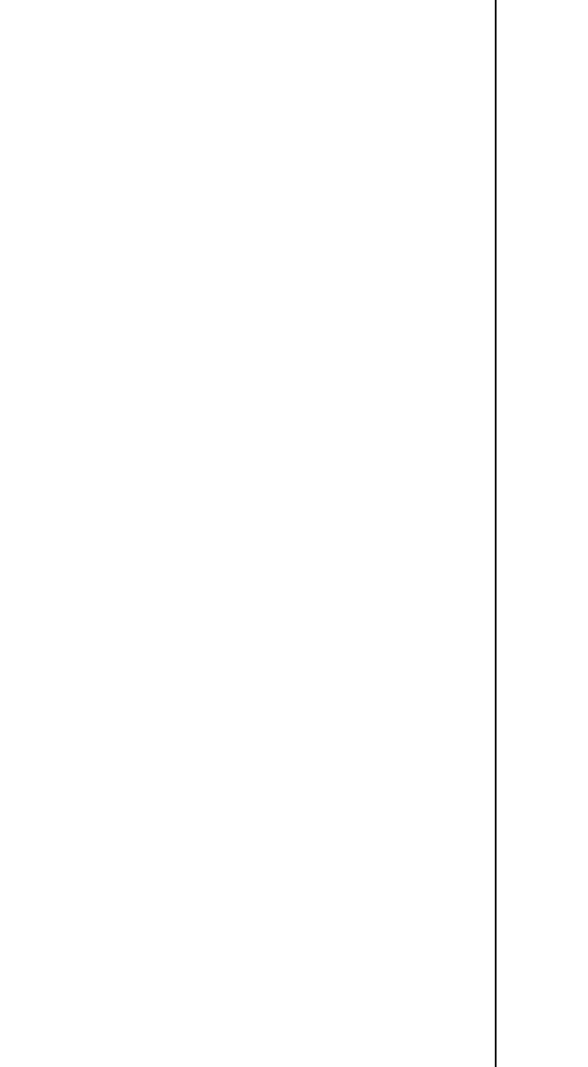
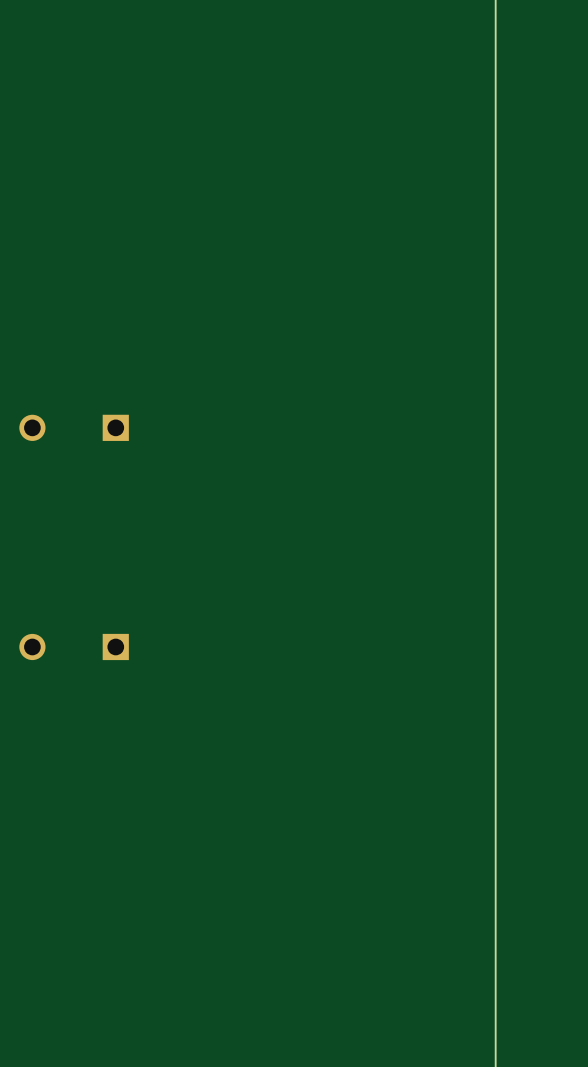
part: none -> (74, 427)
part: none -> (74, 646)

